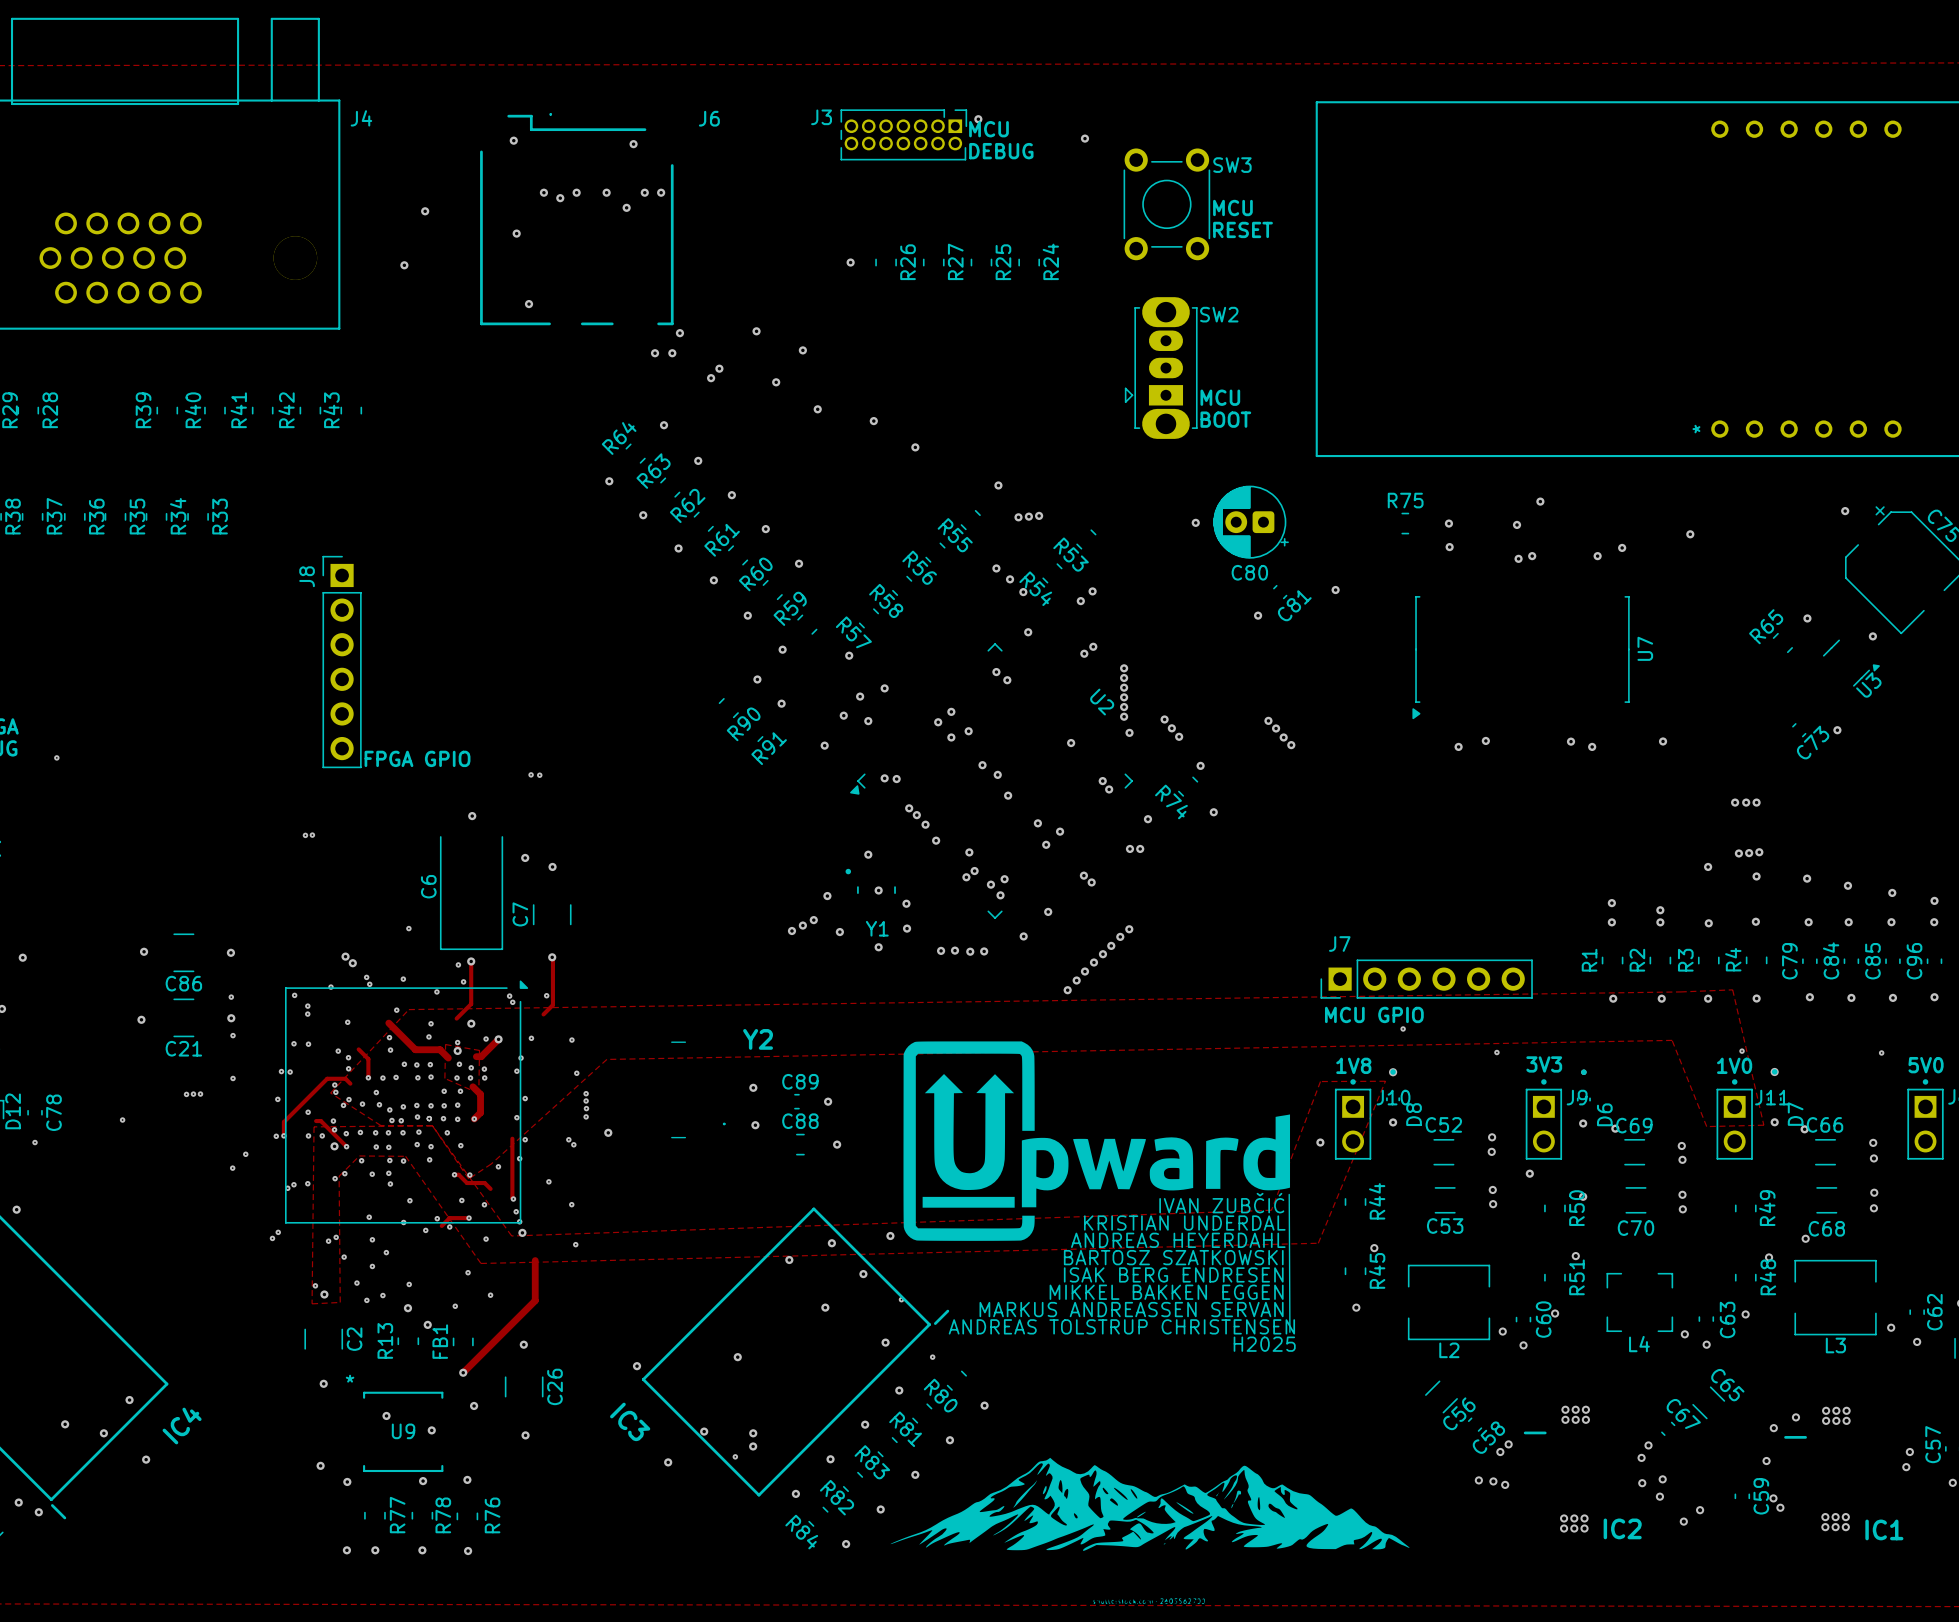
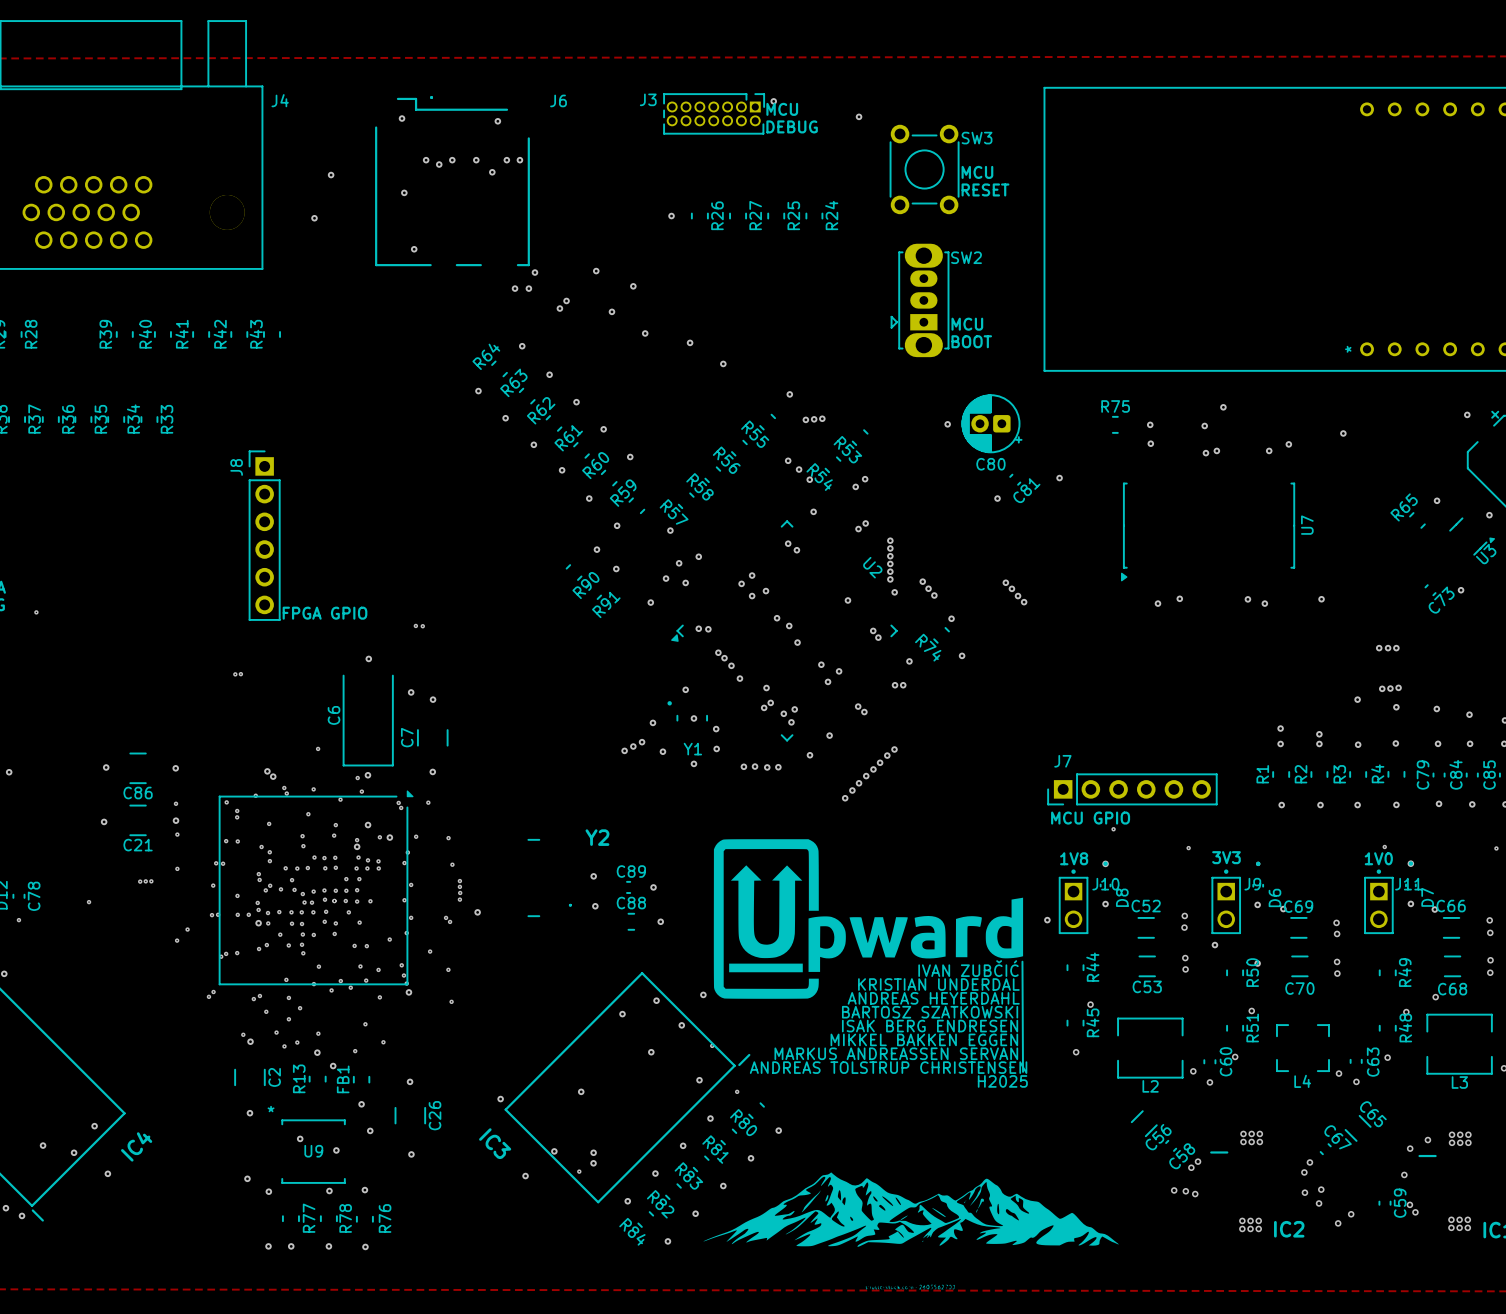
track: (552, 957) (552, 1005) (543, 1014) -> none
track: (471, 961) (471, 1004) (456, 1018) -> none
track: (388, 1023) (415, 1049) (440, 1049) (448, 1058) -> none
track: (498, 1039) (481, 1056) (476, 1056) -> none
zone outline: (445, 1044) (444, 1078) (478, 1093) (479, 1050) (445, 1044) -> none
track: (358, 1049) (368, 1059) (368, 1077) -> none
track: (350, 1083) (345, 1078) (327, 1078) (283, 1122) (283, 1135) -> none
track: (472, 1086) (480, 1094) (480, 1112) (474, 1118) -> none
track: (316, 1121) (320, 1121) (346, 1146) -> none
zone outline: (432, 1125) (468, 1178) (491, 1163) (606, 1059) (1672, 1040) (1706, 1126) (1763, 1125) (1732, 989) (408, 1009) (330, 1093) (380, 1125) (432, 1125) -> none
zone outline: (432, 1125) (511, 1235) (1271, 1210) (1320, 1081) (1385, 1081) (1318, 1243) (480, 1263) (405, 1156) (359, 1155) (339, 1176) (340, 1302) (312, 1303) (314, 1126) (432, 1125) -> none
track: (512, 1138) (513, 1199) -> none
track: (454, 1174) (458, 1174) (467, 1183) (484, 1183) (490, 1188) -> none
track: (469, 1218) (449, 1218) (441, 1225) -> none
track: (535, 1260) (535, 1300) (463, 1372) -> none

